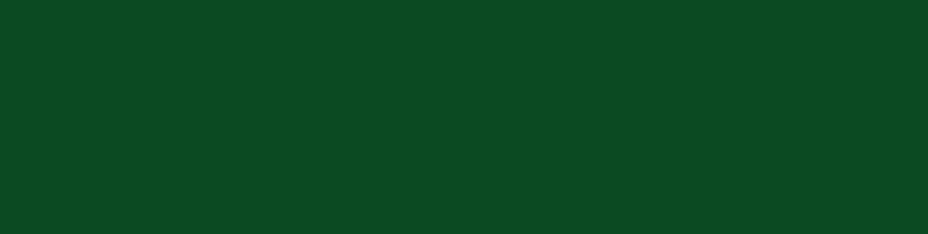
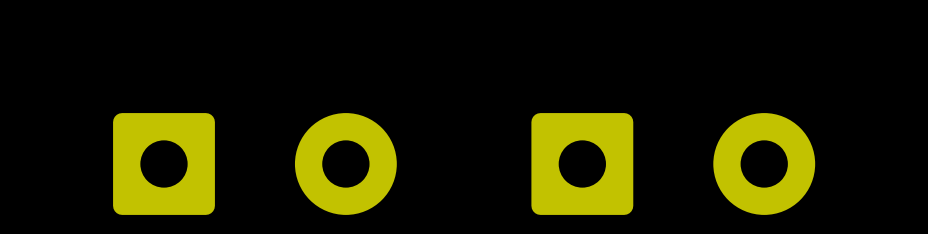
part: none -> (254, 163)
part: none -> (673, 163)

